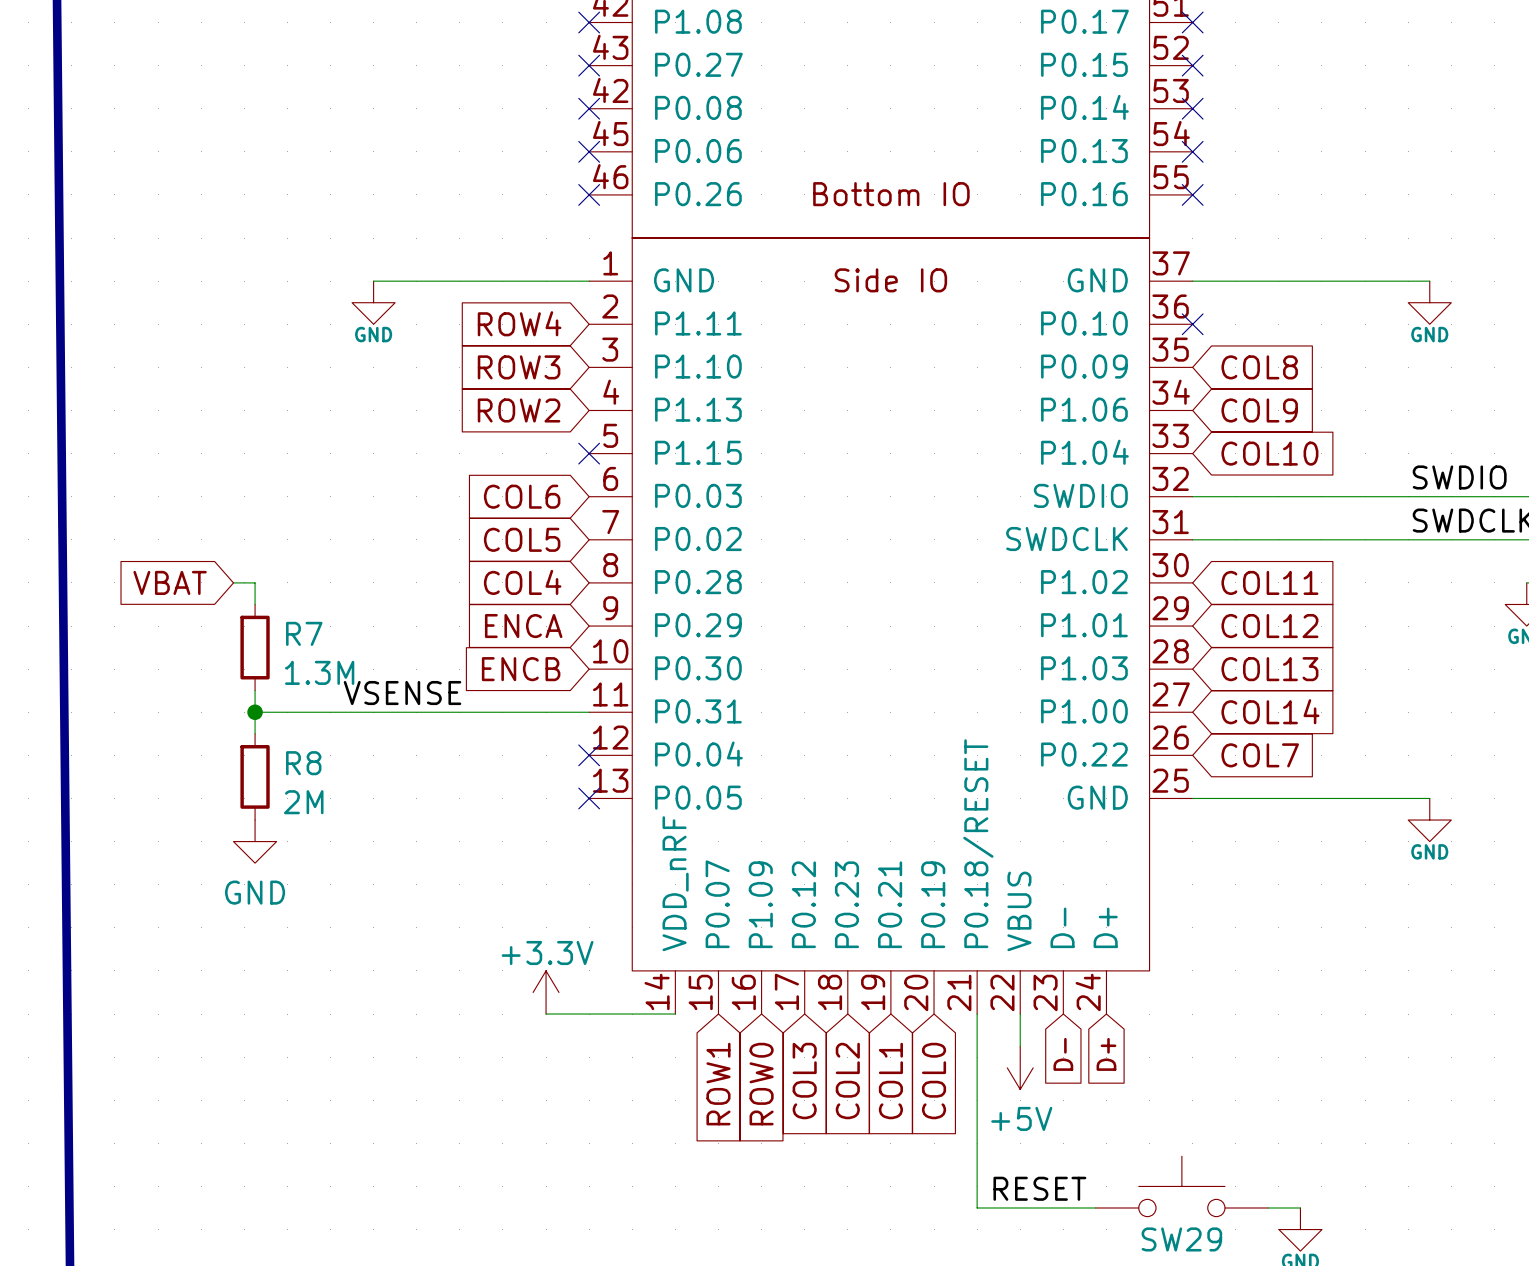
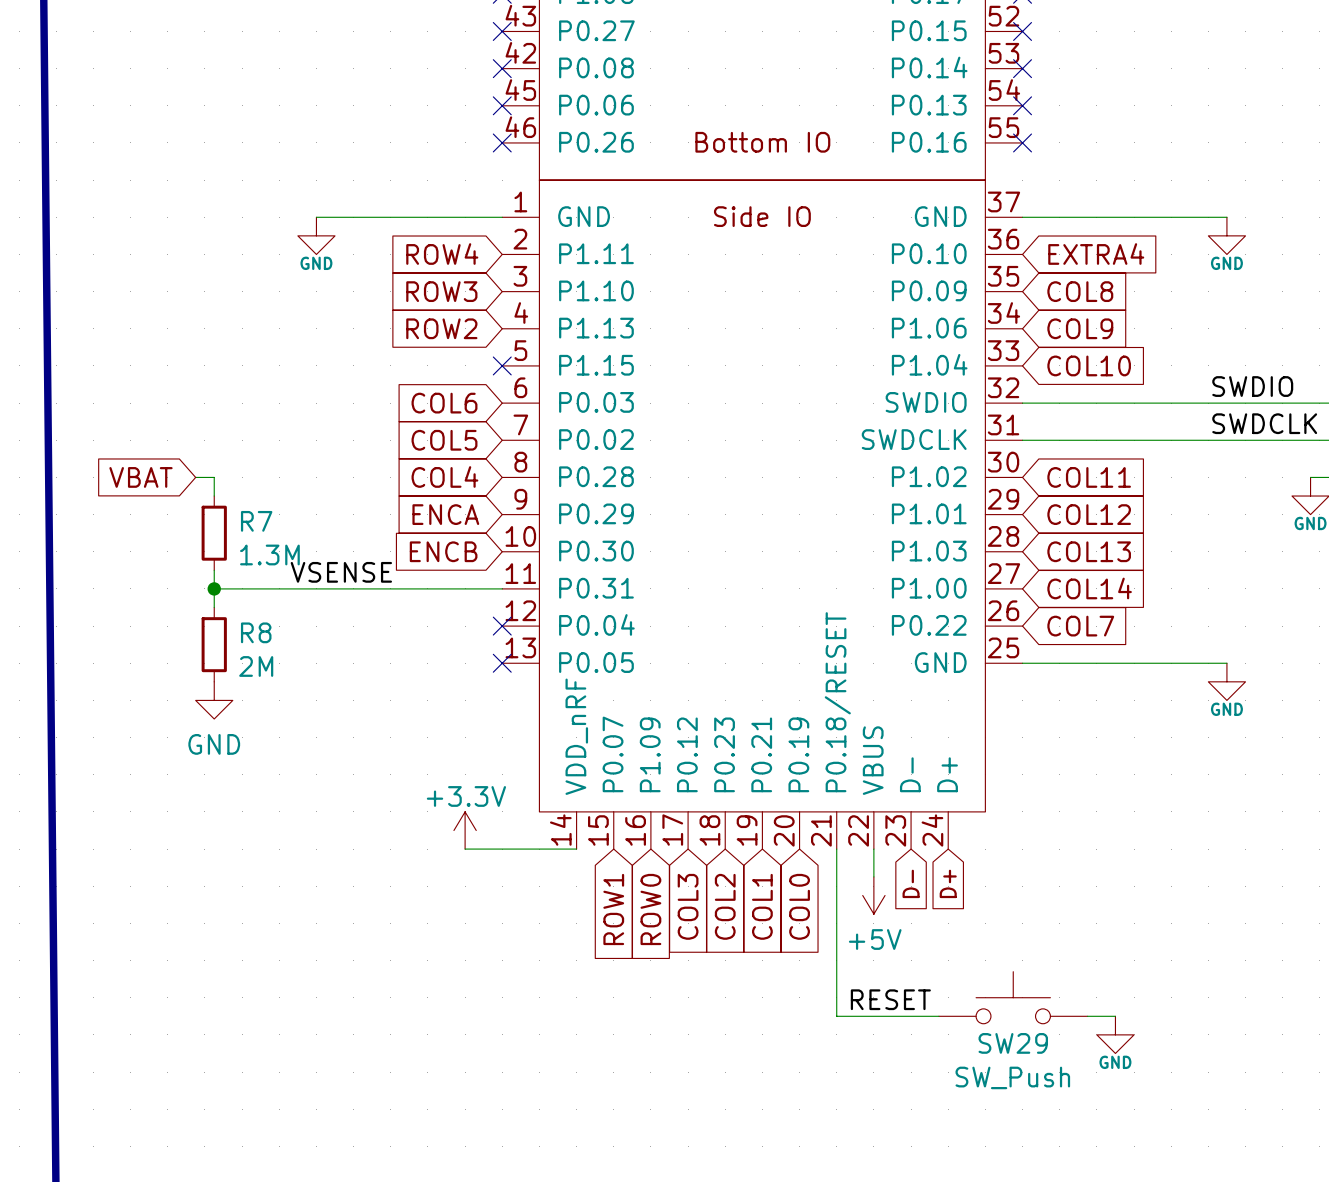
global label: none -> EXTRA4 (1096, 254)
no-connect mark: (1192, 324) -> none

